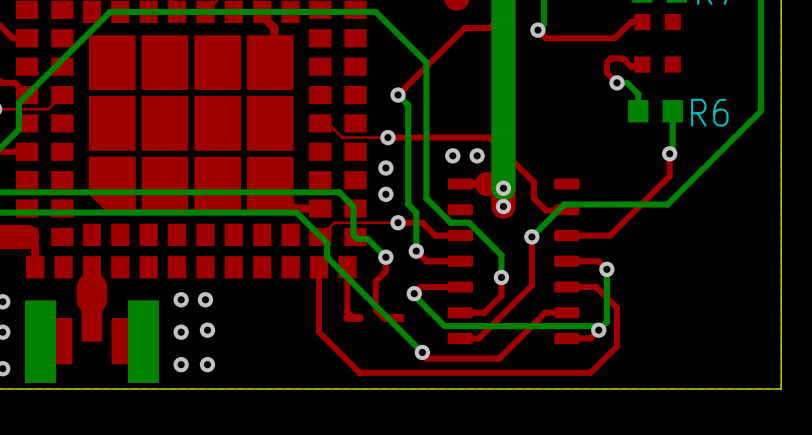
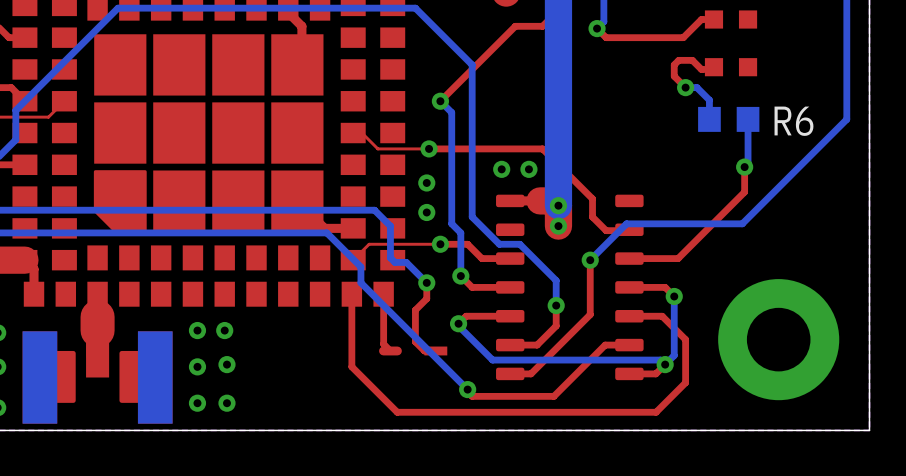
part: none -> (778, 339)

